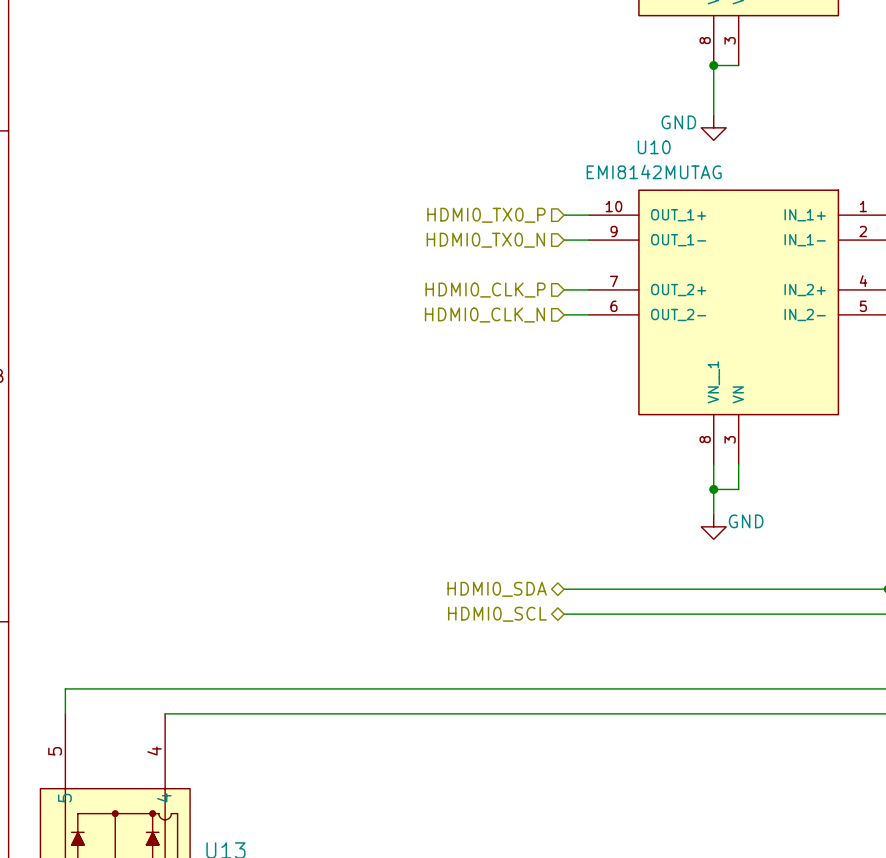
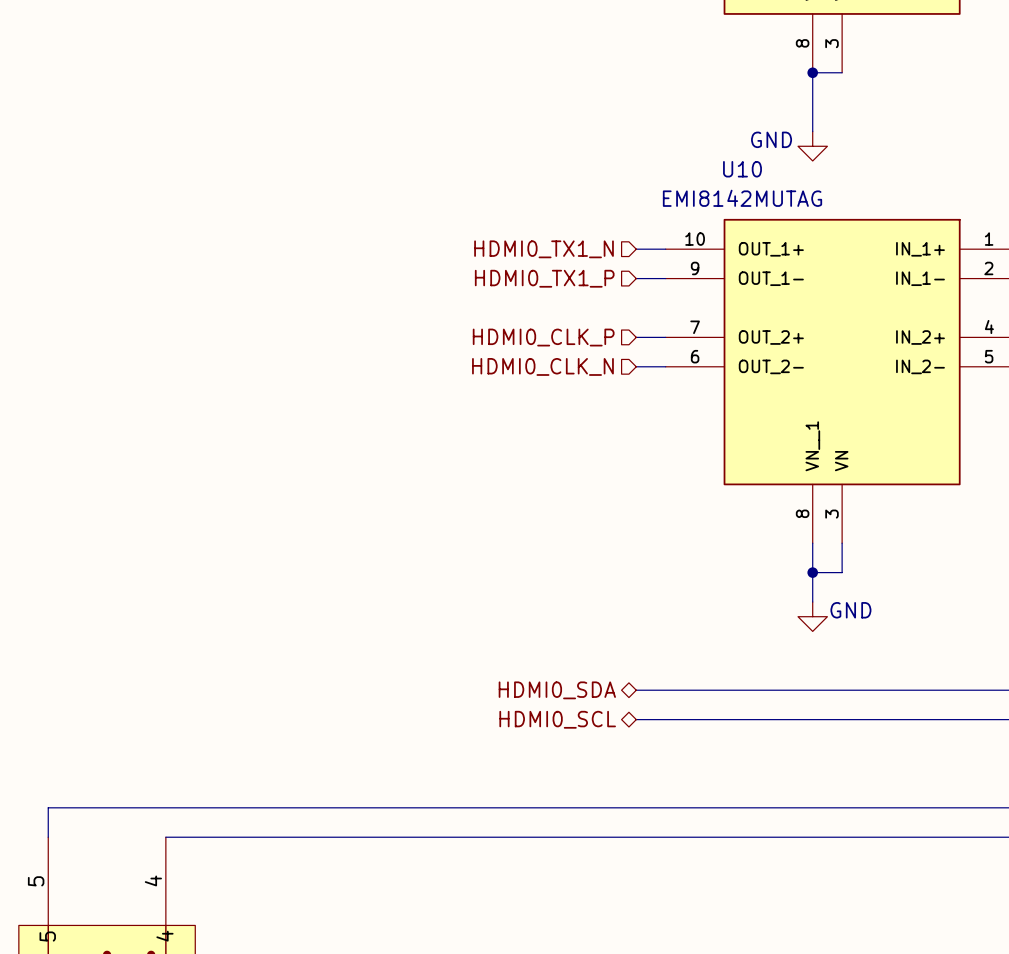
hierarchical label: HDMI0_TX0_P (486, 215) -> HDMI0_TX1_N (544, 249)
hierarchical label: HDMI0_TX0_N (485, 240) -> HDMI0_TX1_P (544, 278)

